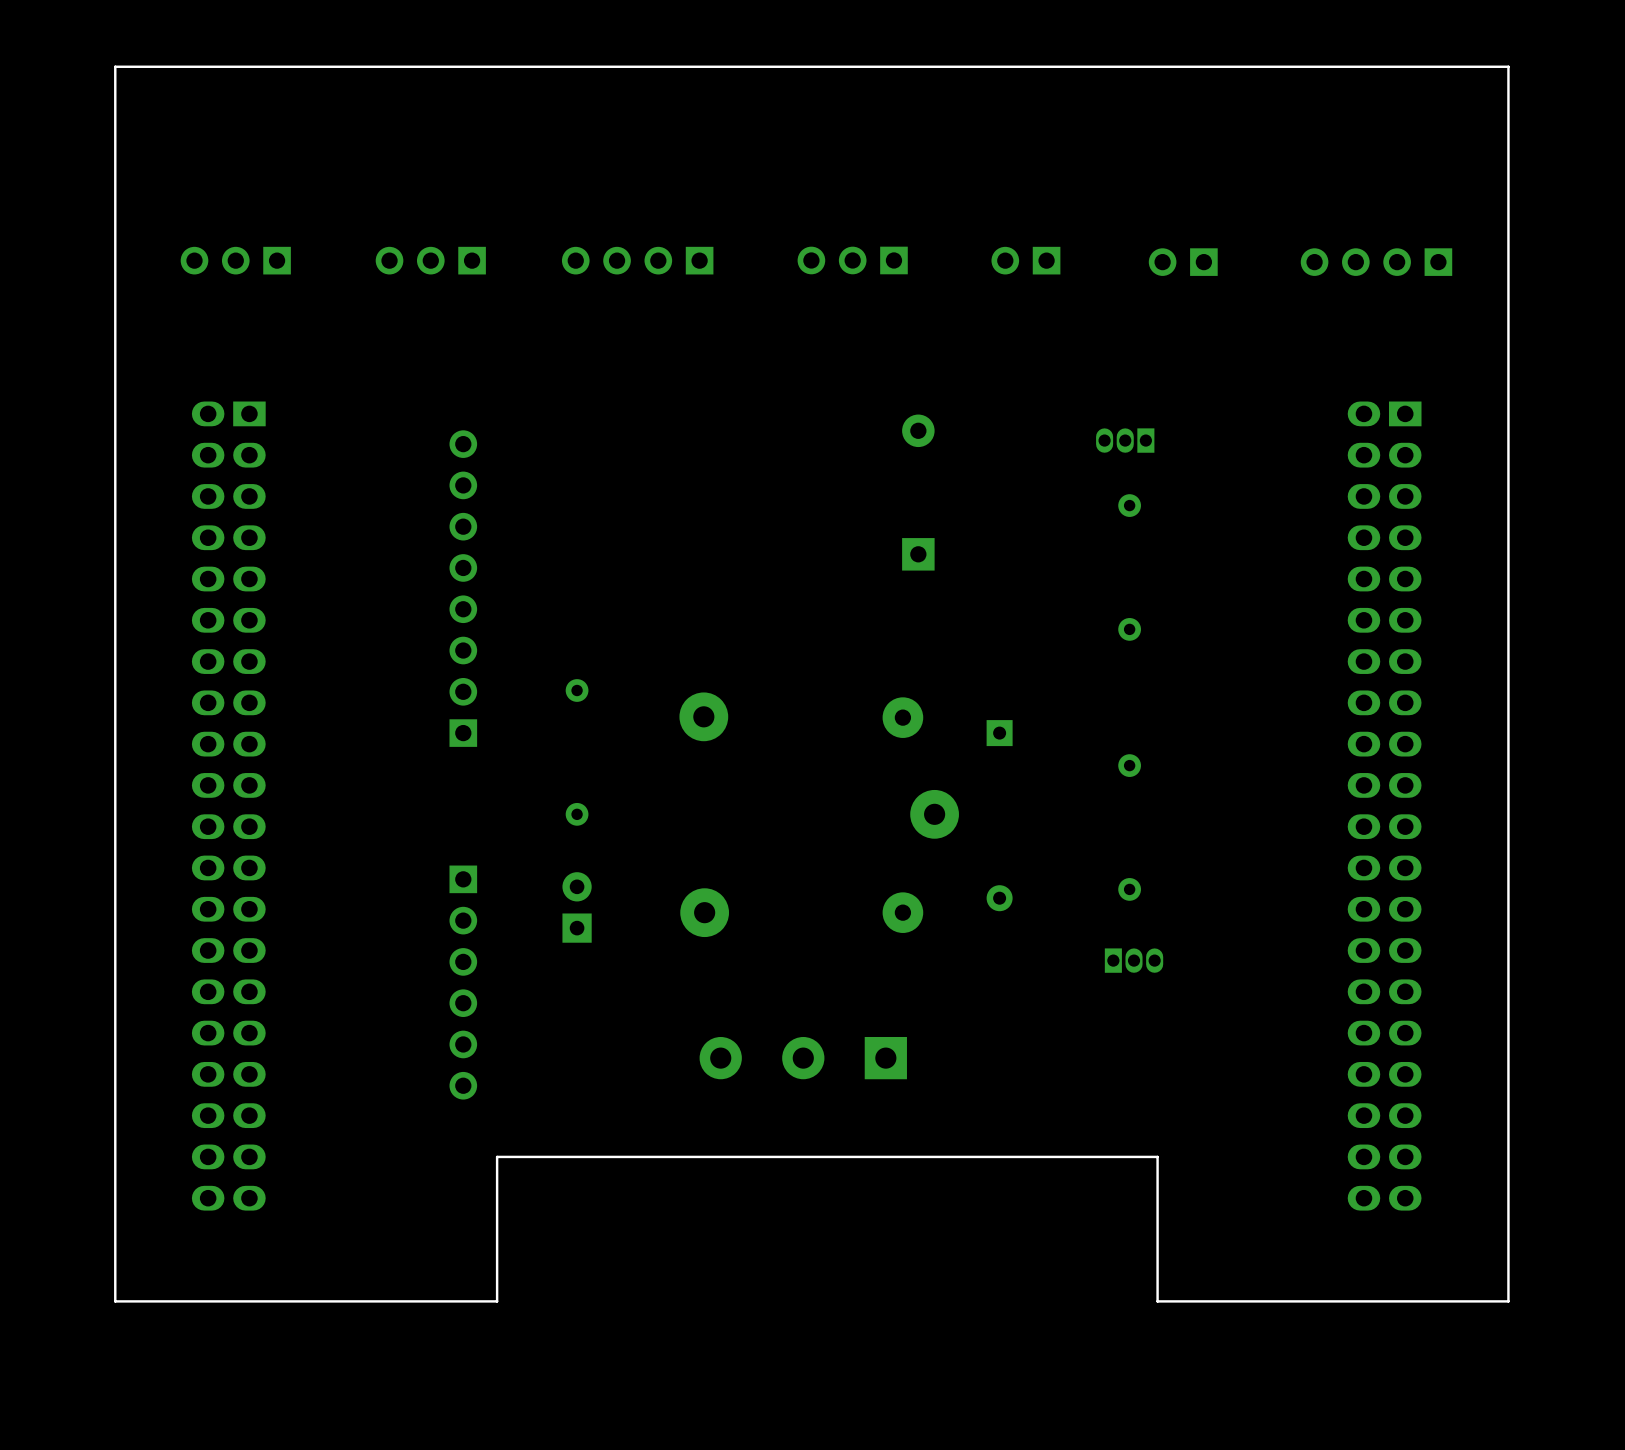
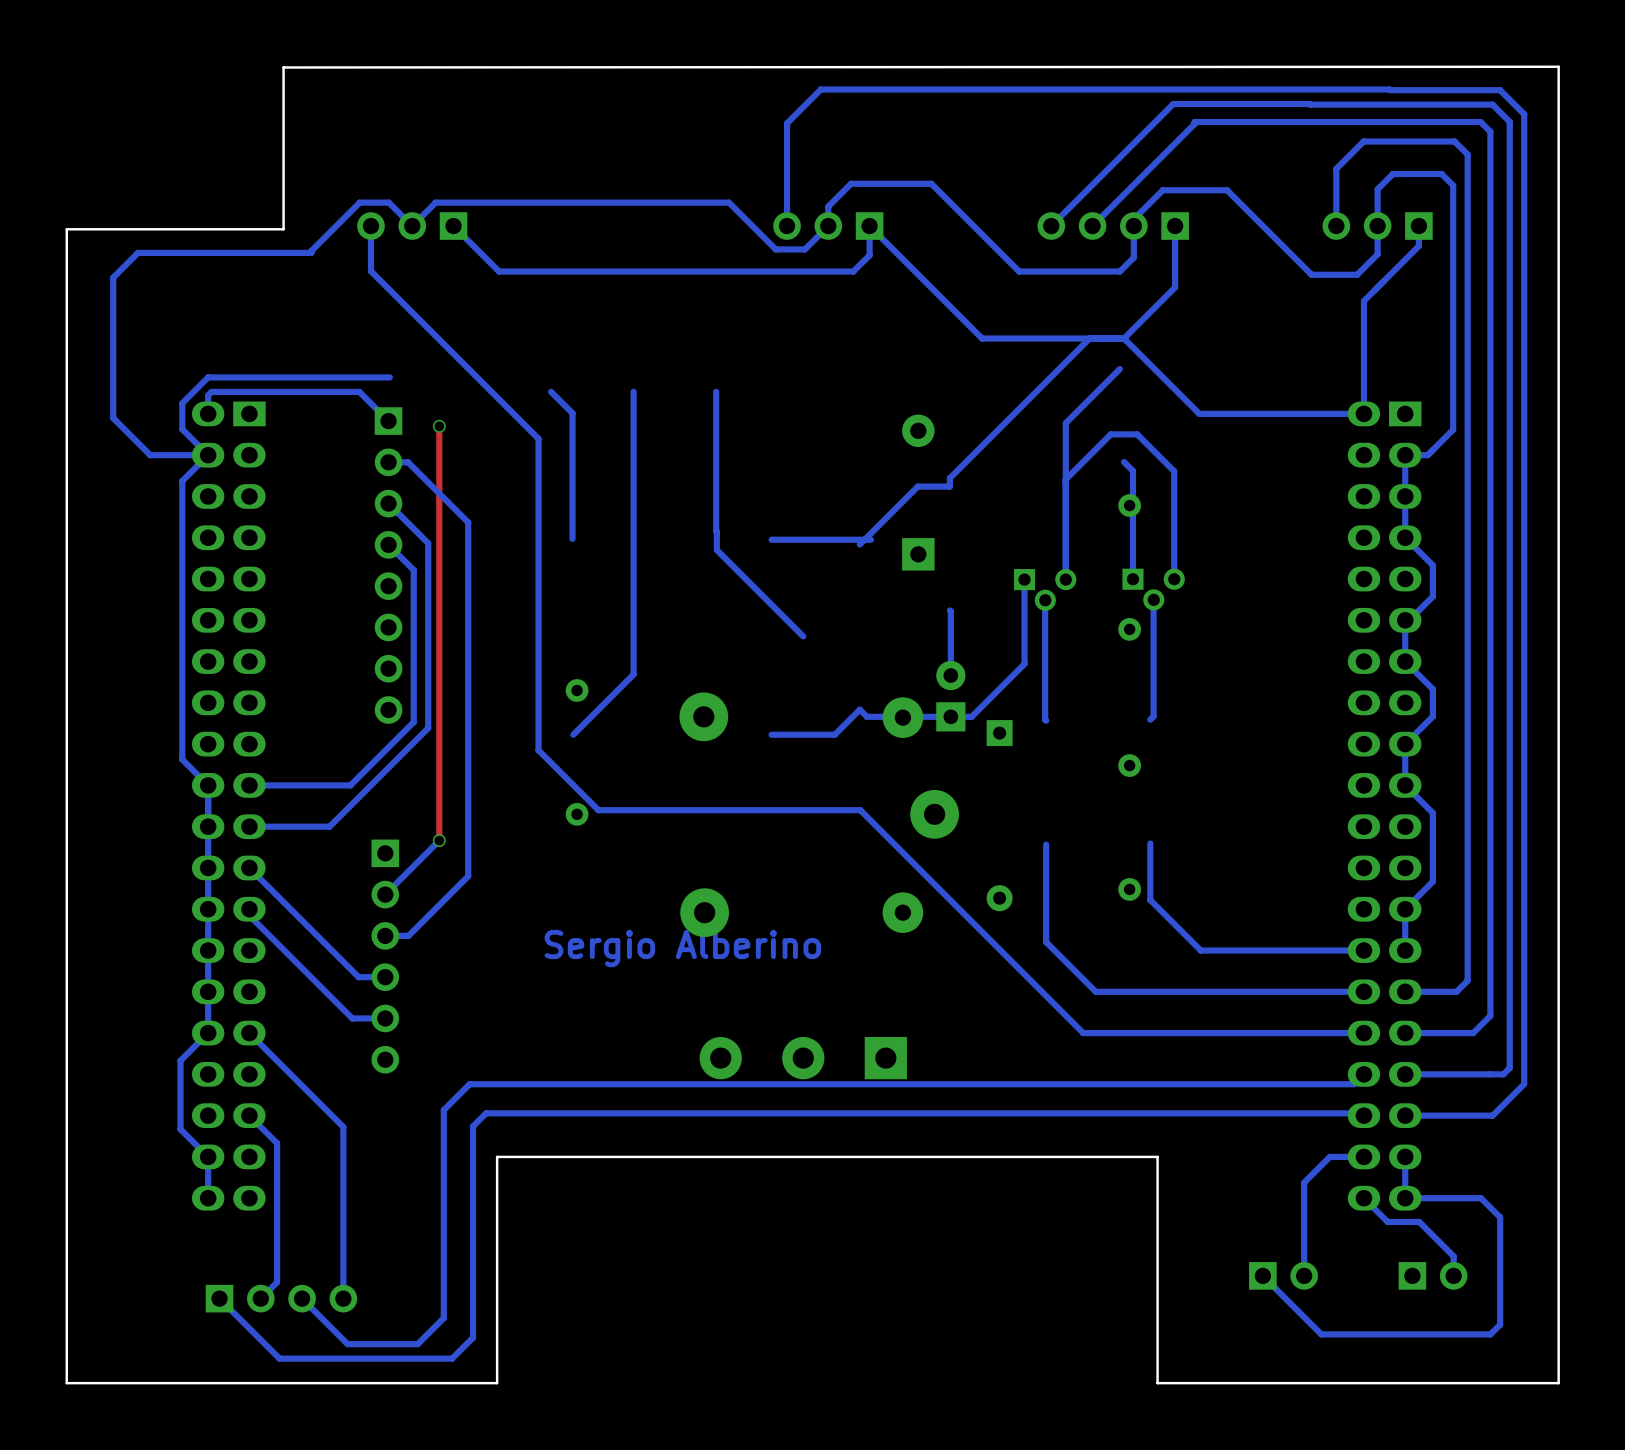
bottom track: none -> (370, 226) (370, 271) (538, 438) (538, 750) (598, 810) (860, 810) (1083, 1033) (1363, 1033)
bottom track: none -> (412, 226) (388, 202) (359, 202) (311, 252) (137, 252) (113, 277) (113, 418) (150, 455) (208, 455)
bottom track: none -> (412, 226) (435, 202) (728, 202) (775, 249) (804, 249) (828, 226) (828, 206) (851, 183) (931, 183) (1019, 271) (1119, 271) (1133, 257) (1133, 219) (1162, 190) (1227, 190) (1311, 274) (1357, 274) (1377, 254) (1377, 189) (1392, 174) (1441, 174) (1453, 185) (1453, 429) (1427, 455) (1405, 455) (1405, 537) (1432, 565) (1432, 596) (1409, 620) (1405, 620) (1405, 661) (1432, 689) (1432, 716) (1405, 744) (1405, 785) (1432, 813) (1432, 881) (1405, 909) (1405, 950)
bottom track: none -> (453, 226) (499, 271) (853, 271) (869, 255) (869, 226) (982, 338) (1124, 338)
bottom track: none -> (787, 226) (787, 123) (820, 89) (1500, 90) (1524, 114) (1524, 1084) (1492, 1115) (1405, 1115)
bottom track: none -> (1051, 226) (1173, 104) (1492, 104) (1509, 121) (1509, 1068) (1503, 1074) (1405, 1074)
bottom track: none -> (1092, 226) (1194, 122) (1480, 122) (1490, 131) (1490, 1015) (1473, 1033) (1405, 1033)
part: none -> (1113, 226)
bottom track: none -> (1175, 226) (1175, 287) (1124, 338)
bottom track: none -> (1336, 226) (1336, 168) (1363, 141) (1454, 141) (1467, 154) (1467, 980) (1456, 991) (1405, 991)
part: none -> (1377, 226)
bottom track: none -> (1418, 226) (1418, 246) (1363, 300) (1363, 413) (1199, 413) (1124, 338)
part: (235, 260) -> none
part position: (430, 260) -> (412, 226)
part: (637, 260) -> none
part position: (852, 260) -> (828, 226)
part: (1025, 260) -> none
part: (1183, 262) -> none
part: (1376, 262) -> none
bottom track: none -> (1089, 338) (949, 478) (949, 486) (917, 486) (859, 544)
bottom track: none -> (1119, 369) (1065, 423) (1065, 585)
bottom track: none -> (389, 377) (208, 377) (182, 403) (182, 429) (208, 455)
bottom track: none -> (551, 391) (572, 413) (572, 538)
bottom track: none -> (633, 391) (633, 674) (573, 734)
bottom track: none -> (716, 391) (716, 549) (803, 636)
bottom track: none -> (208, 413) (208, 395) (211, 391) (359, 391) (388, 421)
top track: none -> (439, 426) (439, 840)
via: none -> (439, 426)
part: (1125, 440) -> none
bottom track: none -> (208, 455) (182, 481) (182, 759) (208, 785)
bottom track: none -> (388, 462) (408, 462) (468, 522) (468, 876) (408, 935) (383, 935)
bottom track: none -> (1124, 462) (1132, 470) (1132, 579)
bottom track: none -> (1065, 479) (1110, 434) (1137, 434) (1174, 471) (1174, 579)
bottom track: none -> (388, 503) (428, 543) (428, 728) (329, 826) (249, 826)
bottom track: none -> (870, 539) (771, 539)
bottom track: none -> (388, 544) (413, 570) (413, 722) (350, 785) (249, 785)
bottom track: none -> (1025, 579) (1024, 663) (971, 716) (866, 716) (859, 709) (834, 734) (771, 734)
part rotation: 0° (463, 588) -> 180° (388, 565)
part: none -> (1045, 589)
part: none -> (1153, 589)
bottom track: none -> (1153, 599) (1153, 716) (1150, 719)
bottom track: none -> (1045, 600) (1046, 720)
bottom track: none -> (949, 610) (950, 675)
part: none -> (950, 696)
bottom track: none -> (208, 781) (208, 1033) (180, 1060) (180, 1129) (208, 1156) (208, 1198)
bottom track: none -> (439, 840) (383, 894)
via: none -> (439, 840)
bottom track: none -> (1150, 843) (1150, 900) (1200, 950) (1363, 950)
bottom track: none -> (1046, 844) (1046, 942) (1095, 991) (1363, 991)
bottom track: none -> (249, 867) (358, 977) (385, 977)
part: (577, 907) -> none
bottom track: none -> (249, 909) (249, 915) (352, 1018) (385, 1018)
text: none -> Sergio Alberino (682, 948)
part: (1134, 960) -> none
part position: (463, 982) -> (385, 956)
bottom track: none -> (249, 1033) (343, 1127) (343, 1298)
bottom track: none -> (1363, 1074) (1354, 1084) (469, 1084) (443, 1110) (443, 1318) (417, 1344) (347, 1344) (302, 1298)
bottom track: none -> (249, 1115) (277, 1143) (277, 1282) (260, 1298)
bottom track: none -> (1363, 1115) (1361, 1113) (486, 1113) (473, 1126) (473, 1337) (452, 1358) (279, 1358) (219, 1298)
bottom track: none -> (1363, 1156) (1329, 1156) (1304, 1182) (1304, 1275)
bottom track: none -> (1405, 1156) (1405, 1198) (1480, 1198) (1500, 1217) (1500, 1324) (1490, 1334) (1321, 1334) (1262, 1275)
bottom track: none -> (1363, 1198) (1387, 1221) (1419, 1221) (1453, 1256) (1453, 1275)
part: none -> (1283, 1275)
part: none -> (1433, 1275)
part: none -> (281, 1298)
board edge: (1157, 1301) (1508, 1301) (1508, 66) (115, 66) (115, 1301) (497, 1301) -> (1157, 1301) (1157, 1383) (1558, 1383) (1558, 66) (283, 67) (283, 229) (66, 229) (66, 1383) (497, 1383) (497, 1301)

